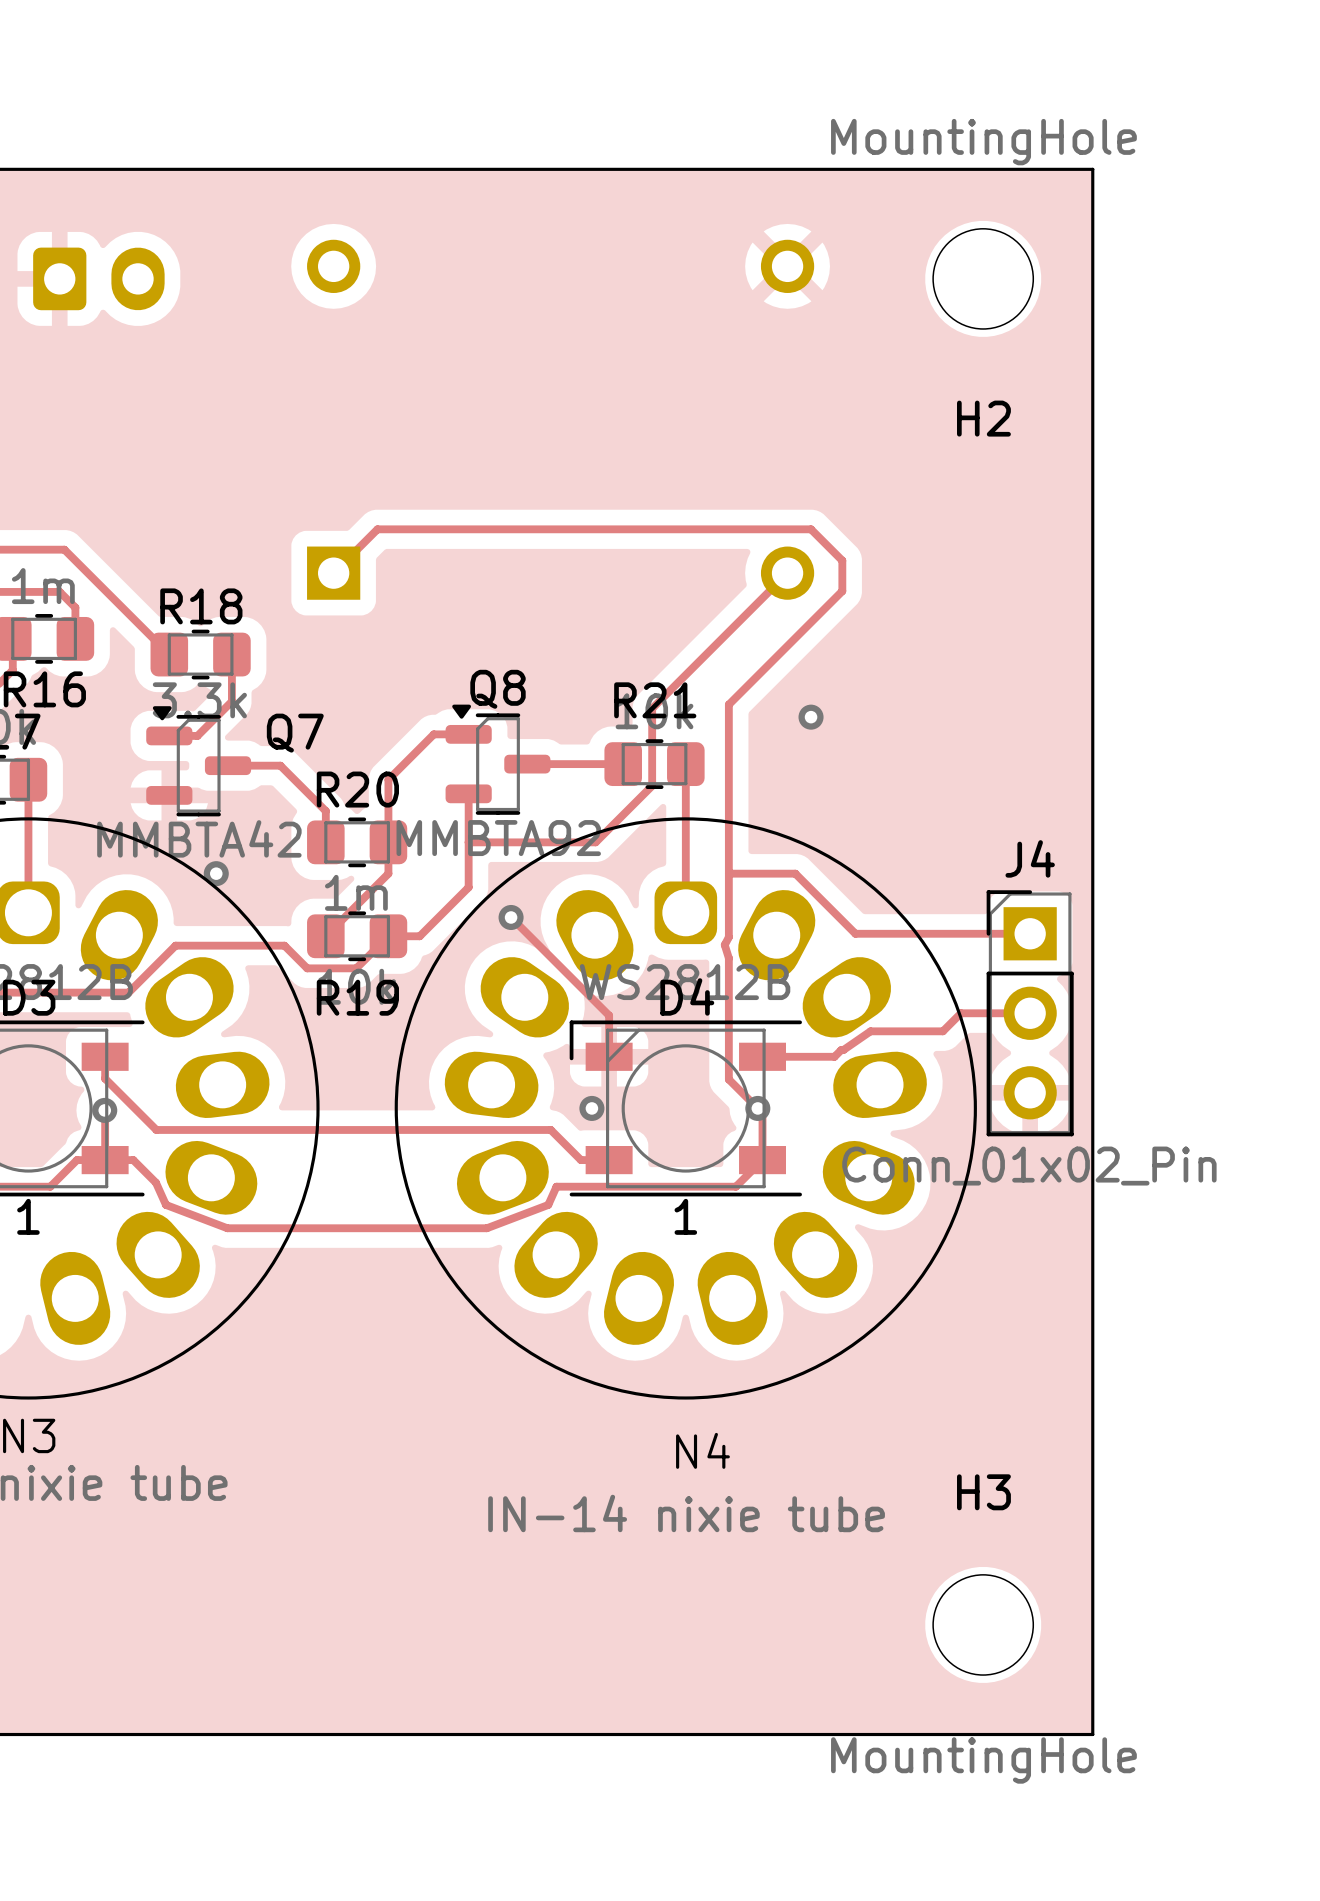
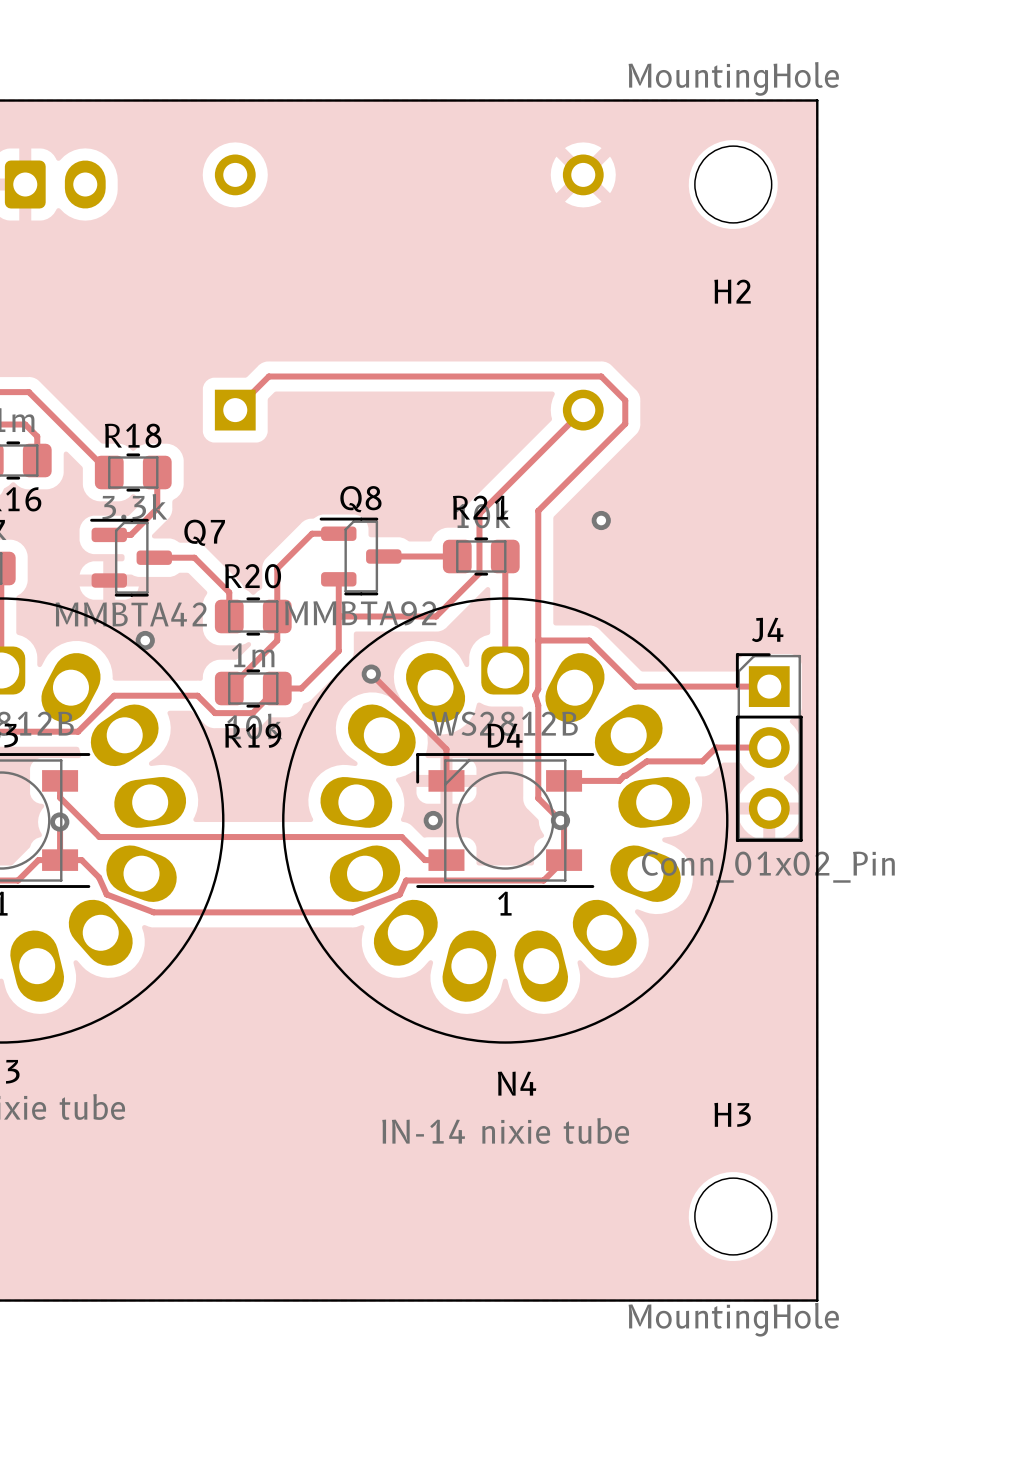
Q8 footprint: [445, 704, 551, 815] -> [319, 517, 402, 596]
Q7 footprint: [146, 706, 252, 817] -> [90, 518, 172, 597]

